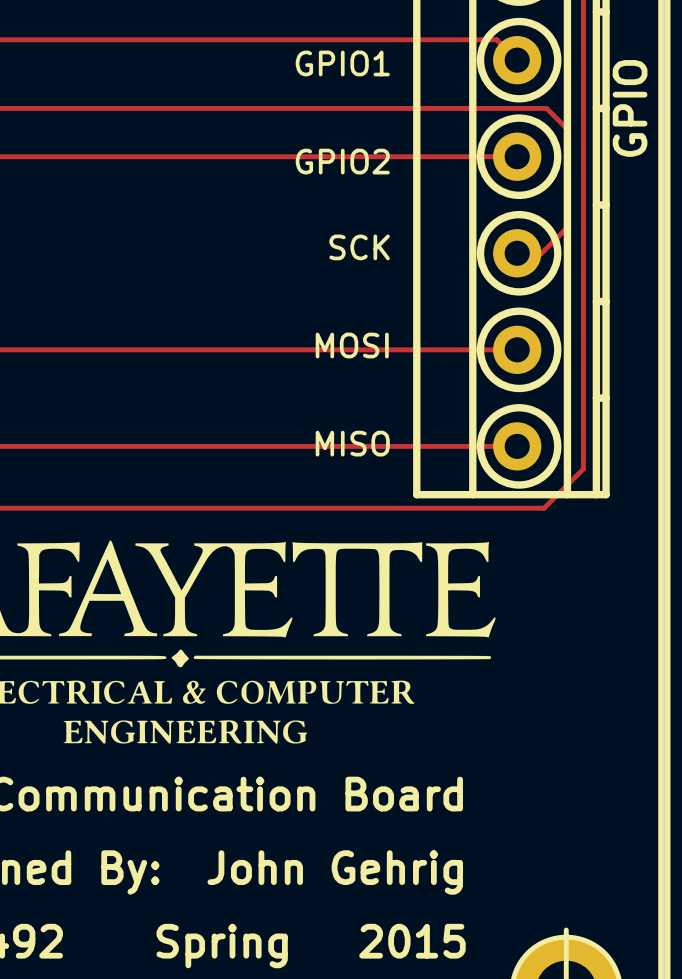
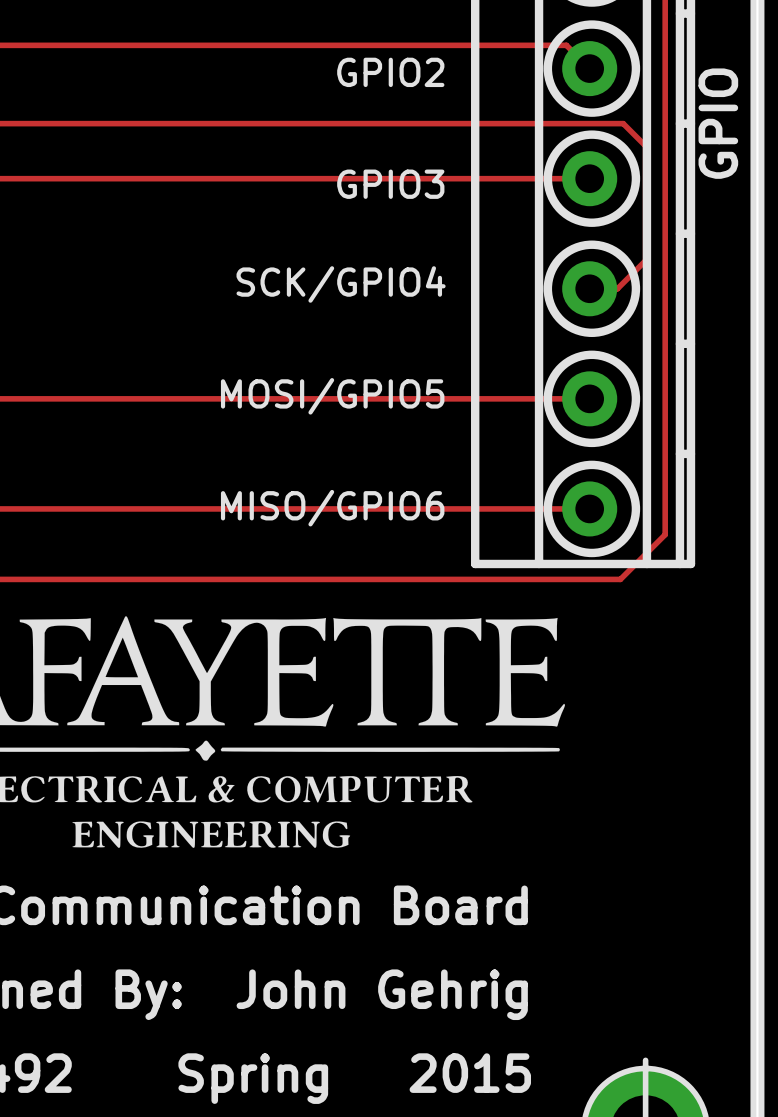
text: GPIO1 (342, 63) -> GPIO2 (390, 72)
text: GPIO2 (342, 161) -> GPIO3 (390, 184)
text: SCK (359, 247) -> SCK/GPIO4 (341, 284)
text: MOSI (352, 345) -> MOSI/GPIO5 (332, 396)
text: MISO (352, 443) -> MISO/GPIO6 (332, 508)

